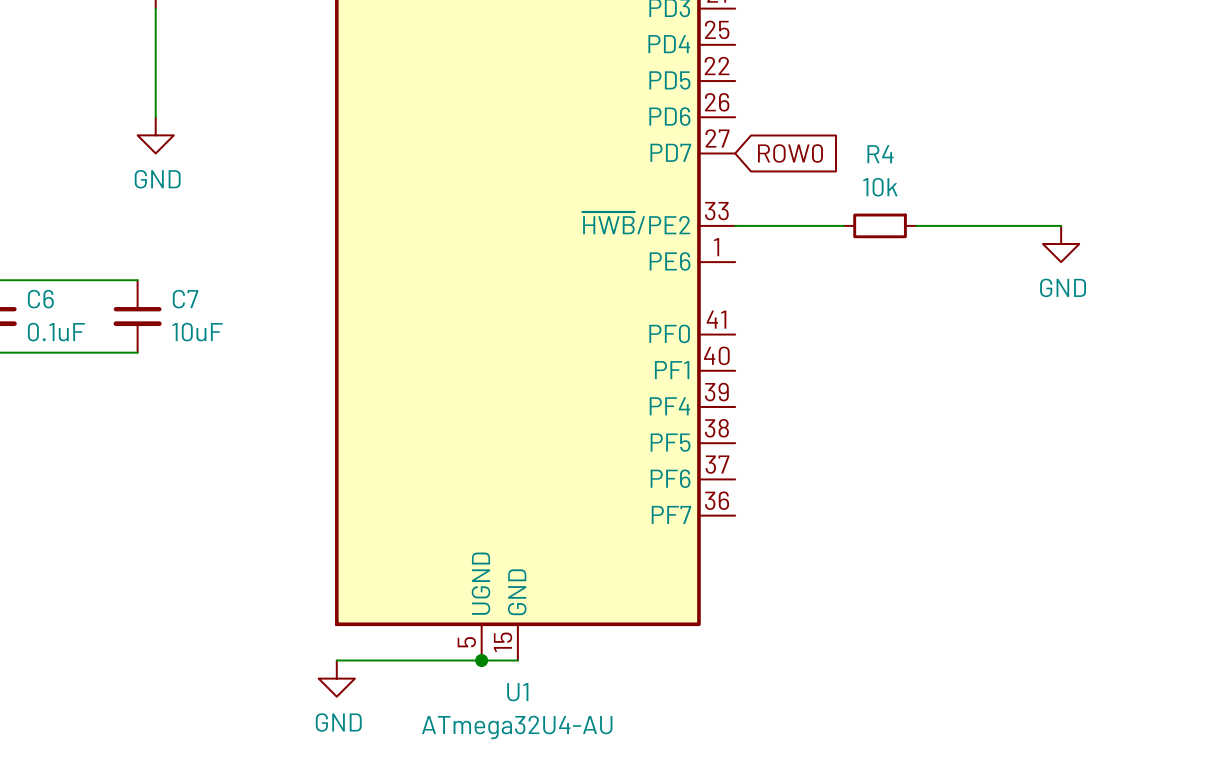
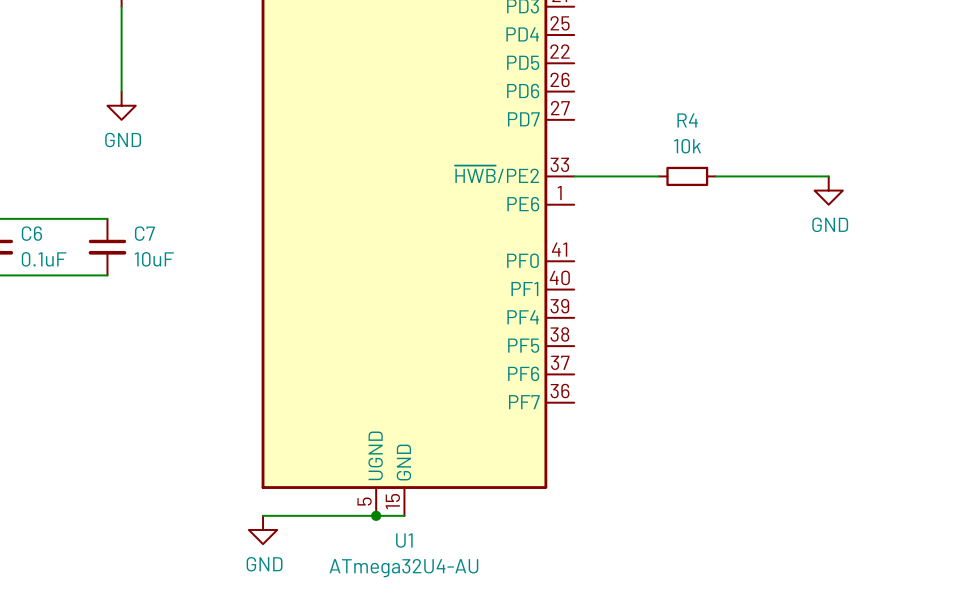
global label: ROW0 (790, 153) -> none

